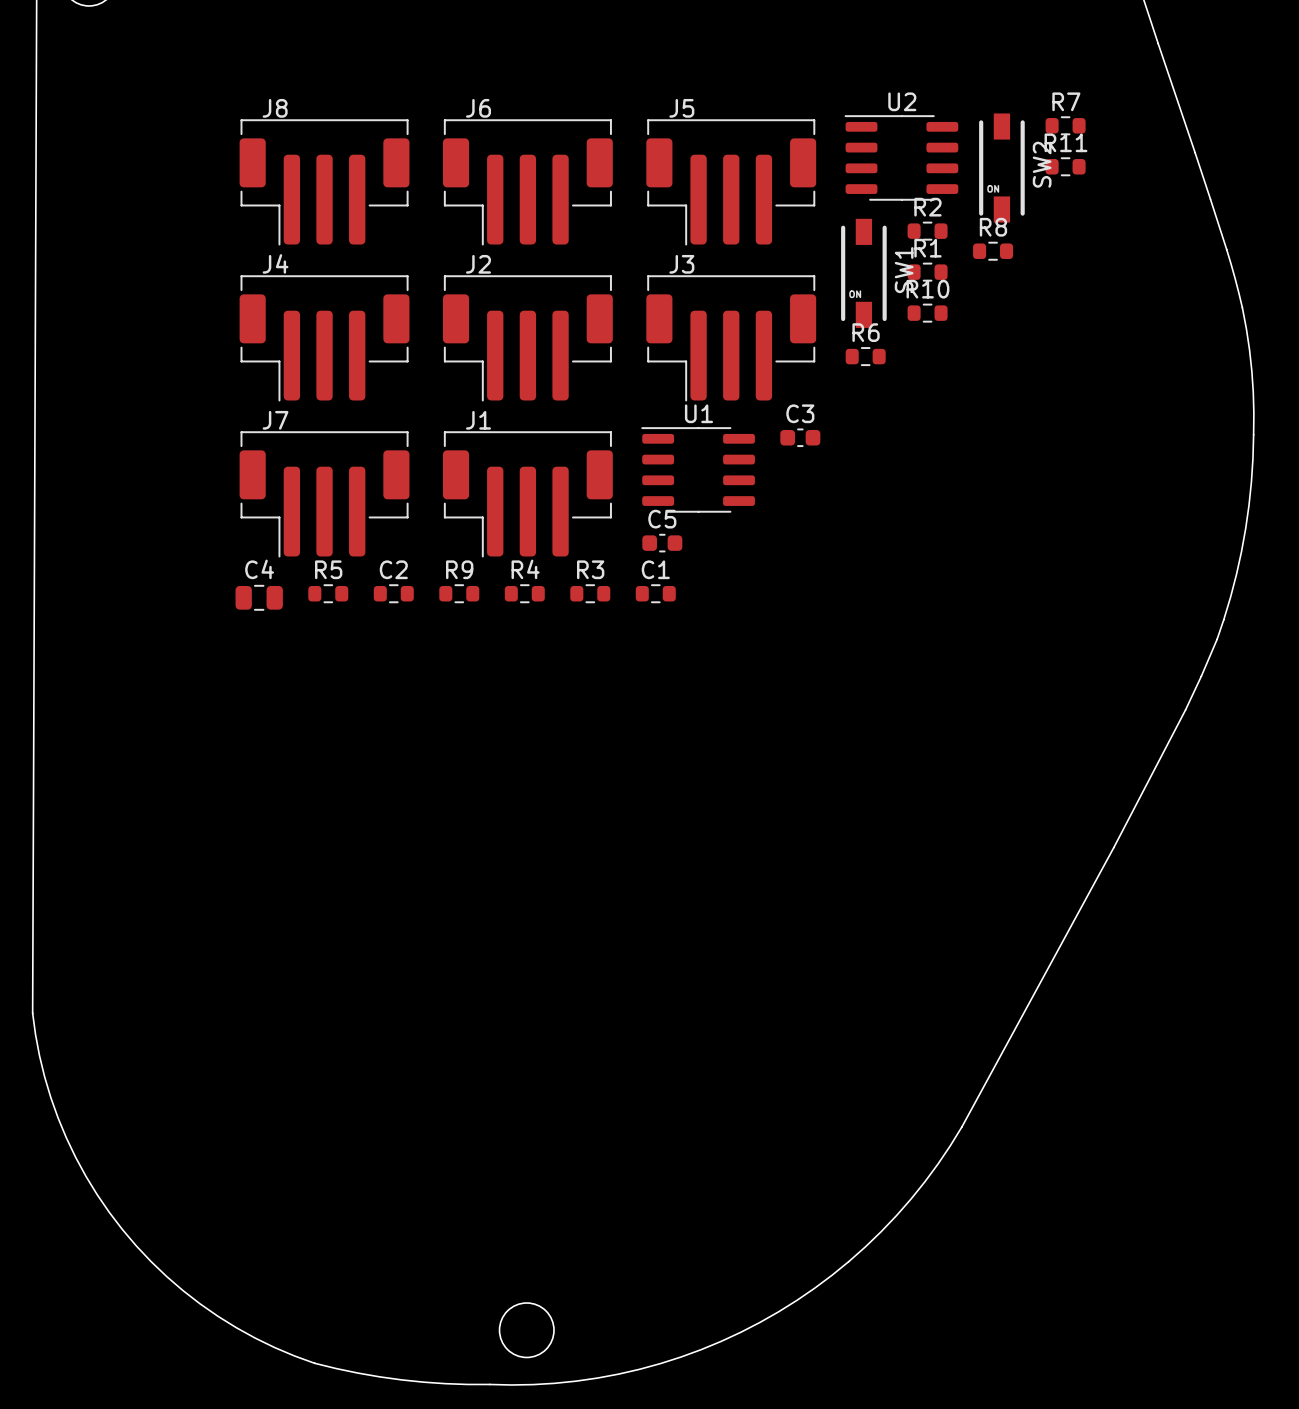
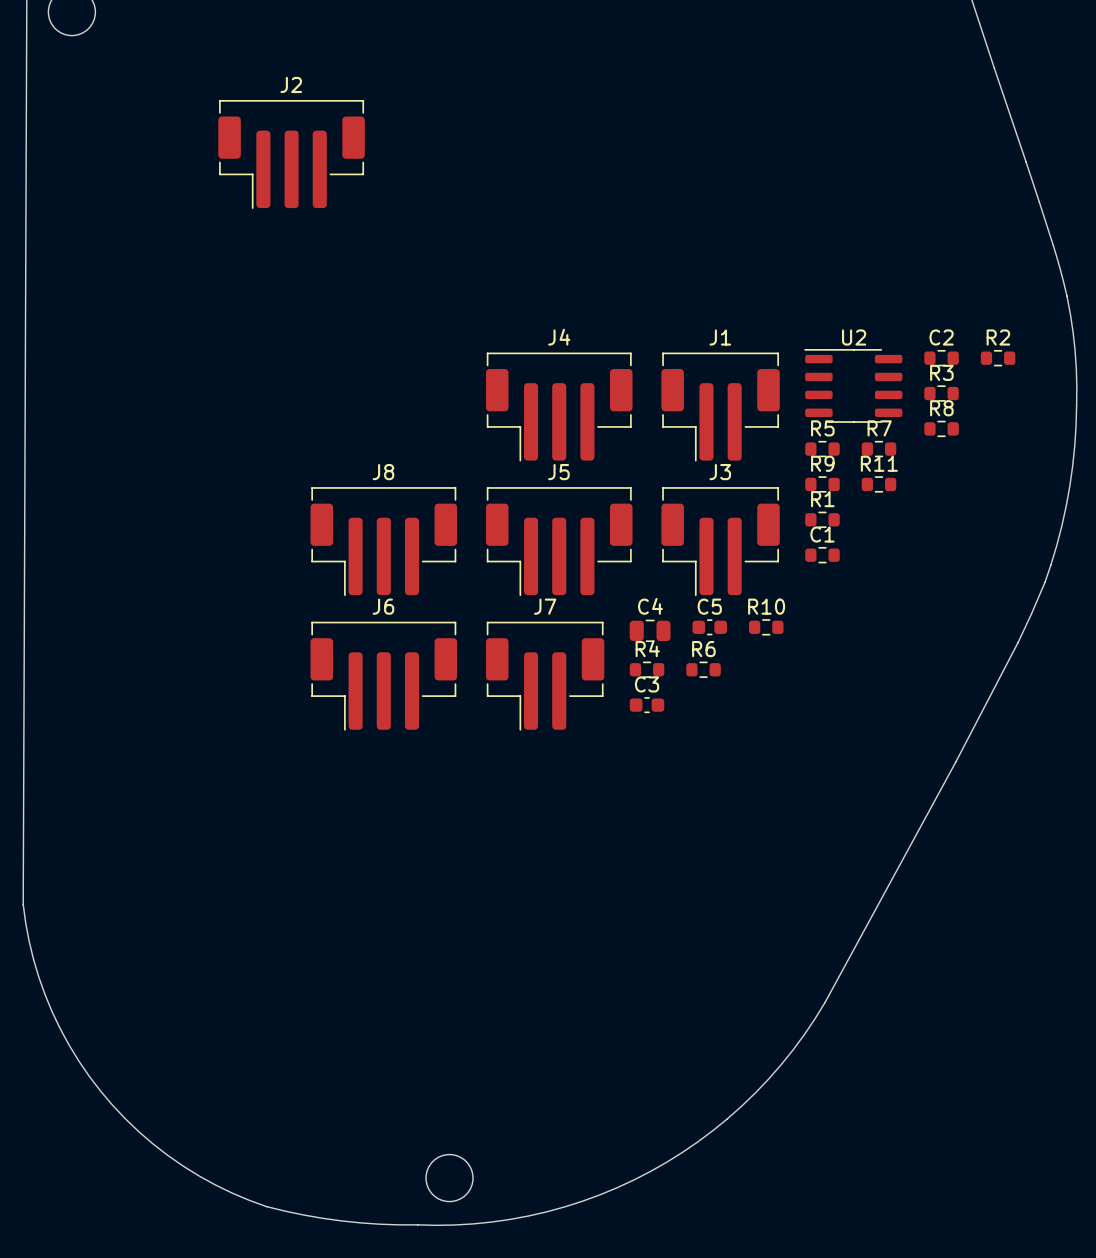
J8 name position: J8 (275, 108) -> J8 (383, 472)
J6 name position: J6 (478, 108) -> J6 (383, 606)
J5 name position: J5 (681, 108) -> J5 (558, 472)
R7 position: (1065, 125) -> (878, 449)
U2 position: (901, 157) -> (853, 385)
R11 position: (1065, 166) -> (878, 484)
SW2: (1001, 168) -> none
J8 position: (324, 182) -> (383, 541)
J6 position: (527, 182) -> (383, 676)
J5 position: (731, 182) -> (559, 541)
R2 position: (927, 231) -> (998, 358)
R8 position: (993, 251) -> (941, 428)
J4 name position: J4 (275, 263) -> J4 (559, 337)
J2 name position: J2 (478, 264) -> J2 (291, 84)
J3 name position: J3 (681, 264) -> J3 (720, 472)
R1 position: (927, 272) -> (822, 519)
SW1: (863, 273) -> none
J3 footprint: [646, 275, 817, 402] -> [661, 487, 780, 597]
R10 position: (927, 313) -> (766, 627)
J4 position: (324, 338) -> (559, 407)
J2 position: (527, 338) -> (291, 154)
R6 position: (865, 356) -> (703, 669)
J7 name position: J7 (275, 420) -> J7 (545, 606)
J1 name position: J1 (478, 420) -> J1 (720, 337)
J7 footprint: [239, 431, 410, 558] -> [485, 621, 605, 731]
J1 footprint: [442, 431, 613, 558] -> [661, 352, 780, 462]
C3 position: (800, 437) -> (647, 705)
U1: (698, 469) -> none
C5 position: (662, 543) -> (709, 627)
R5 position: (328, 593) -> (822, 449)
C2 position: (393, 593) -> (941, 358)
R9 position: (459, 593) -> (822, 484)
R4 position: (524, 593) -> (647, 669)
R3 position: (590, 593) -> (941, 393)
C1 position: (655, 593) -> (822, 555)
C4 position: (259, 597) -> (650, 630)

